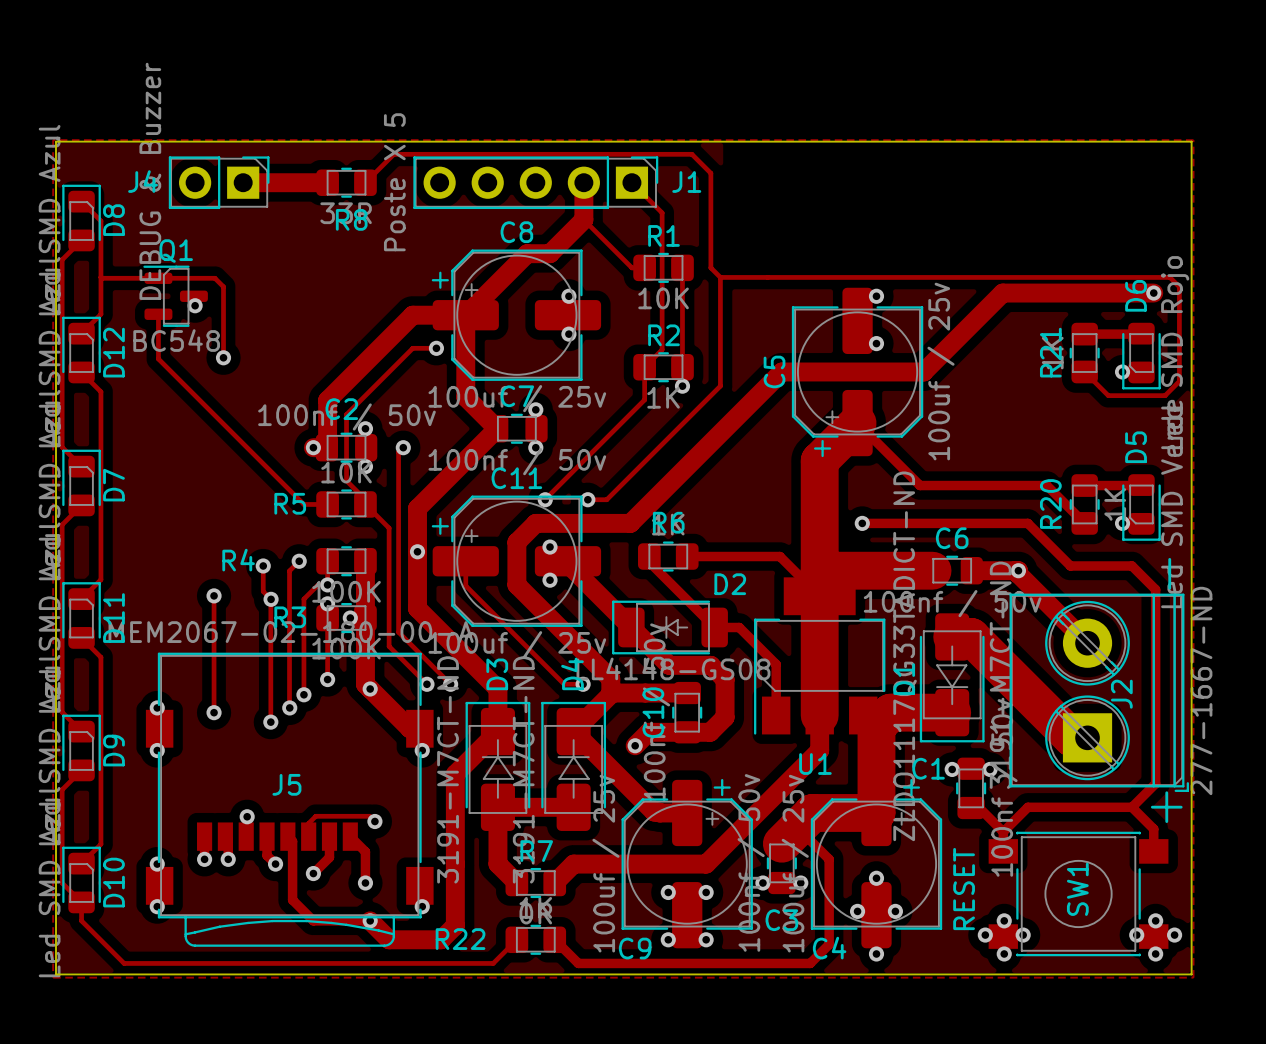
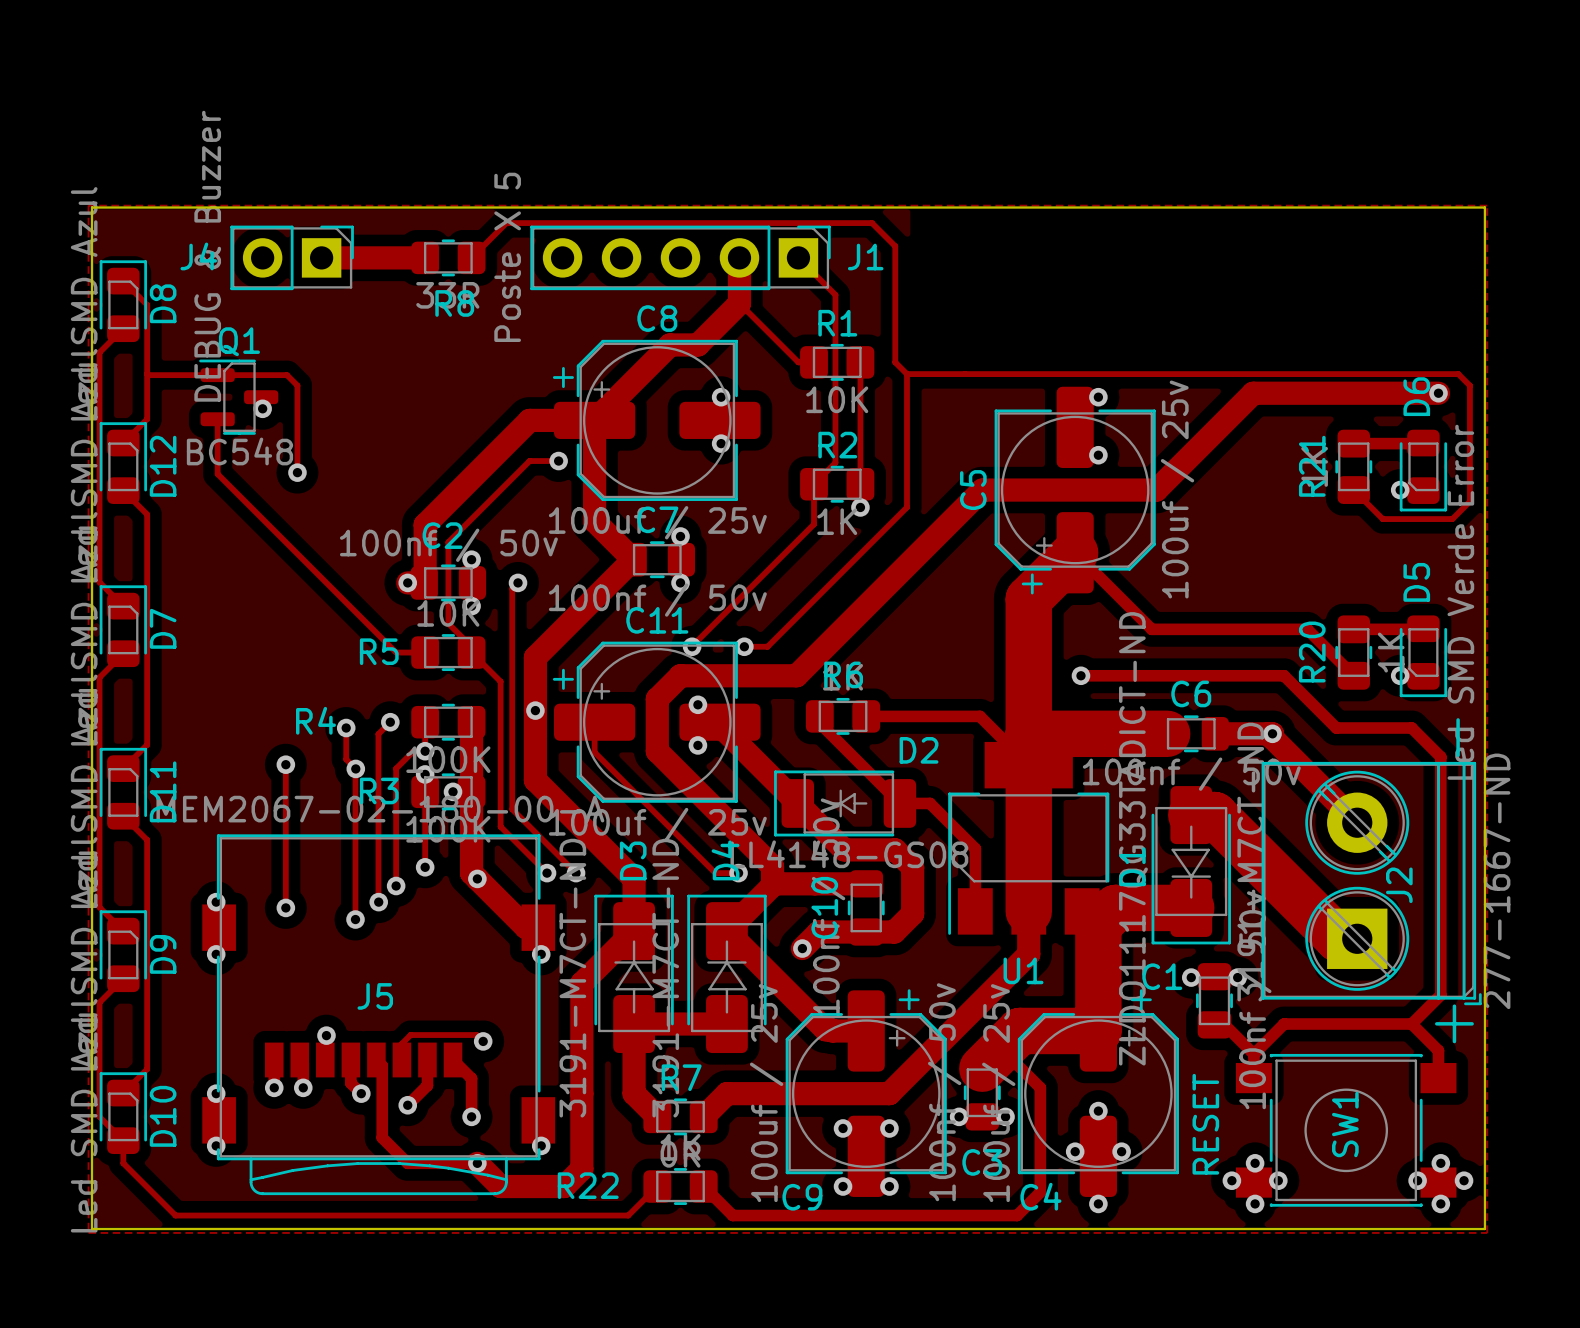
D6 value: Led SMD Rojo (1175, 352) -> Error (1460, 465)

